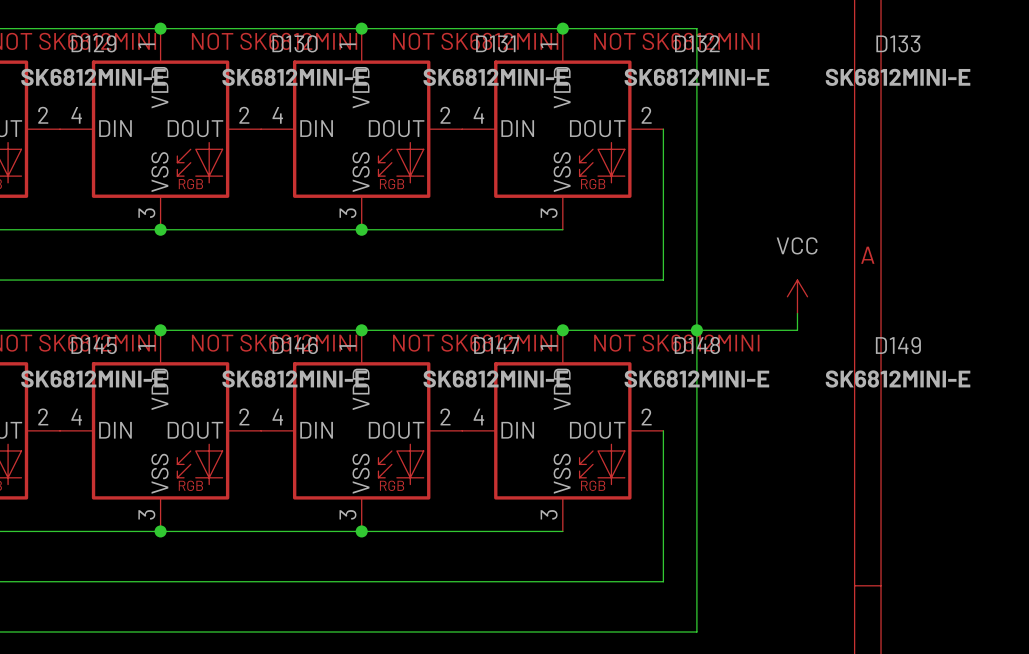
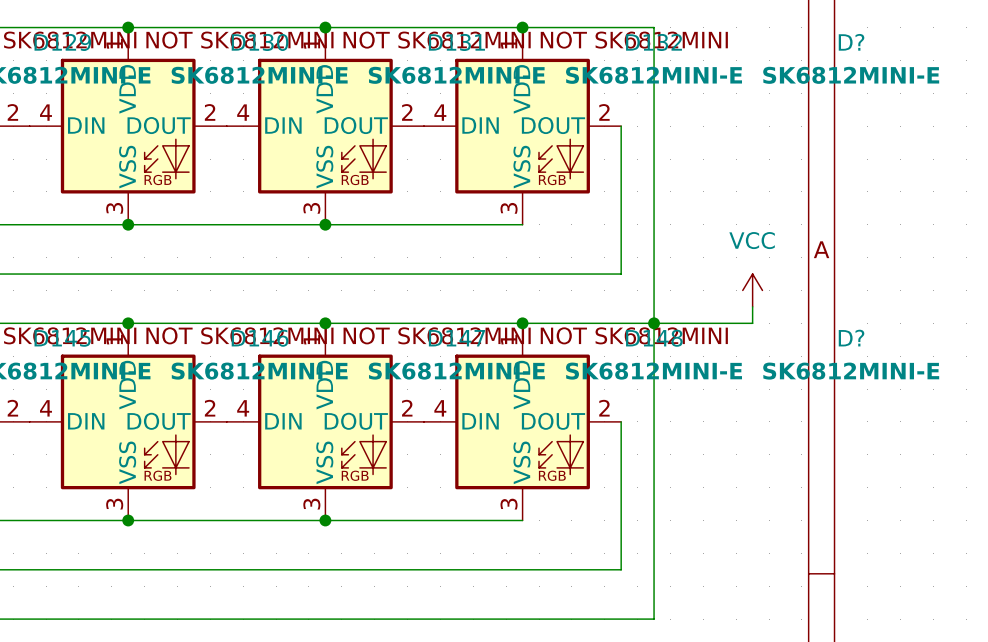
D133 name: D133 (898, 43) -> D? (851, 42)
D149 name: D149 (898, 345) -> D? (851, 338)

